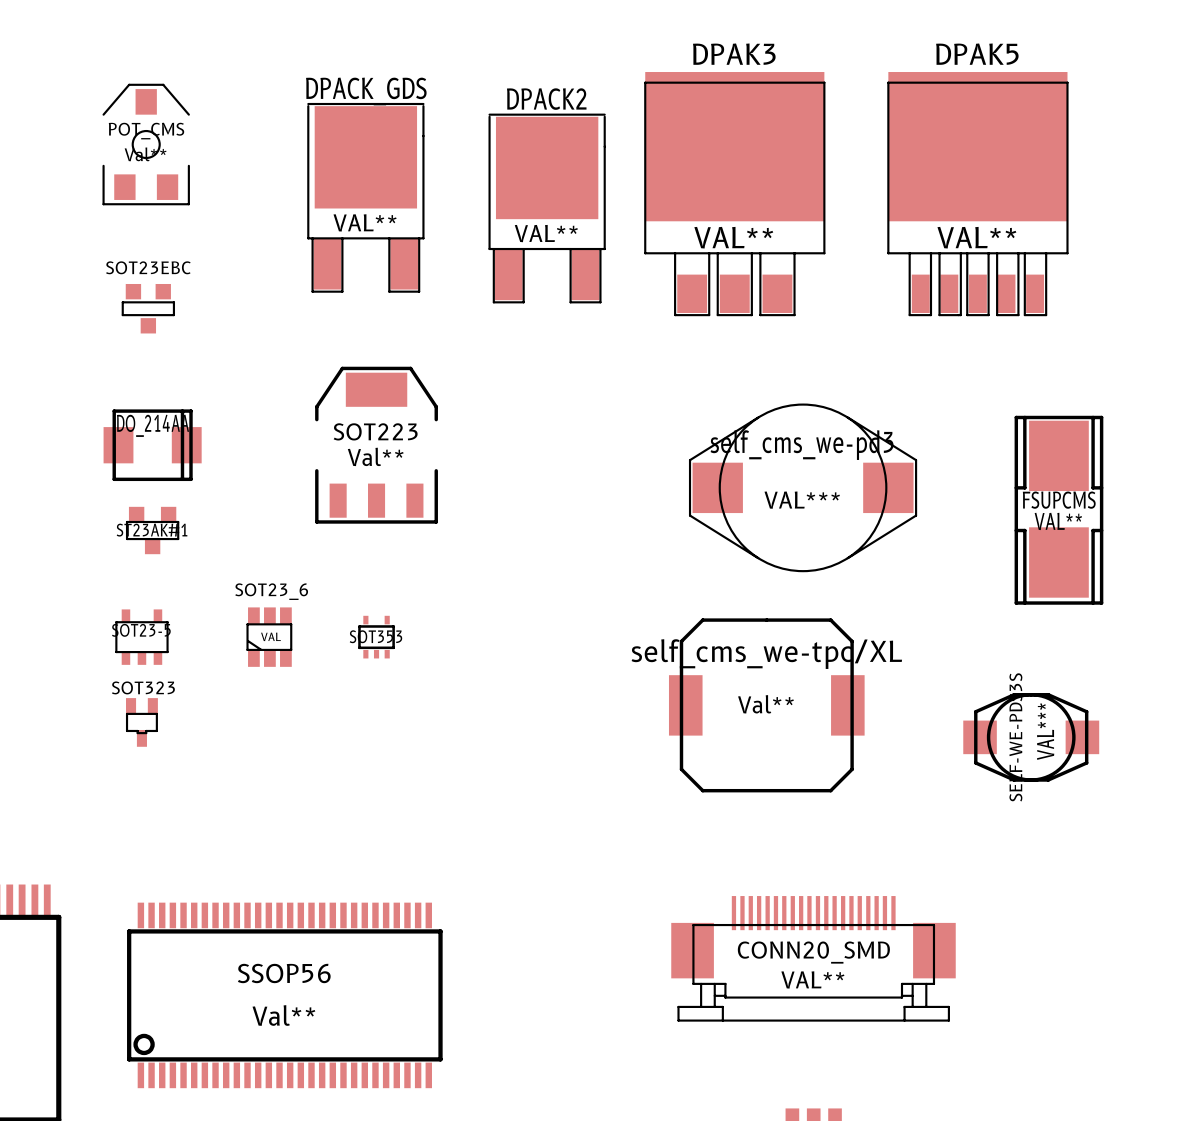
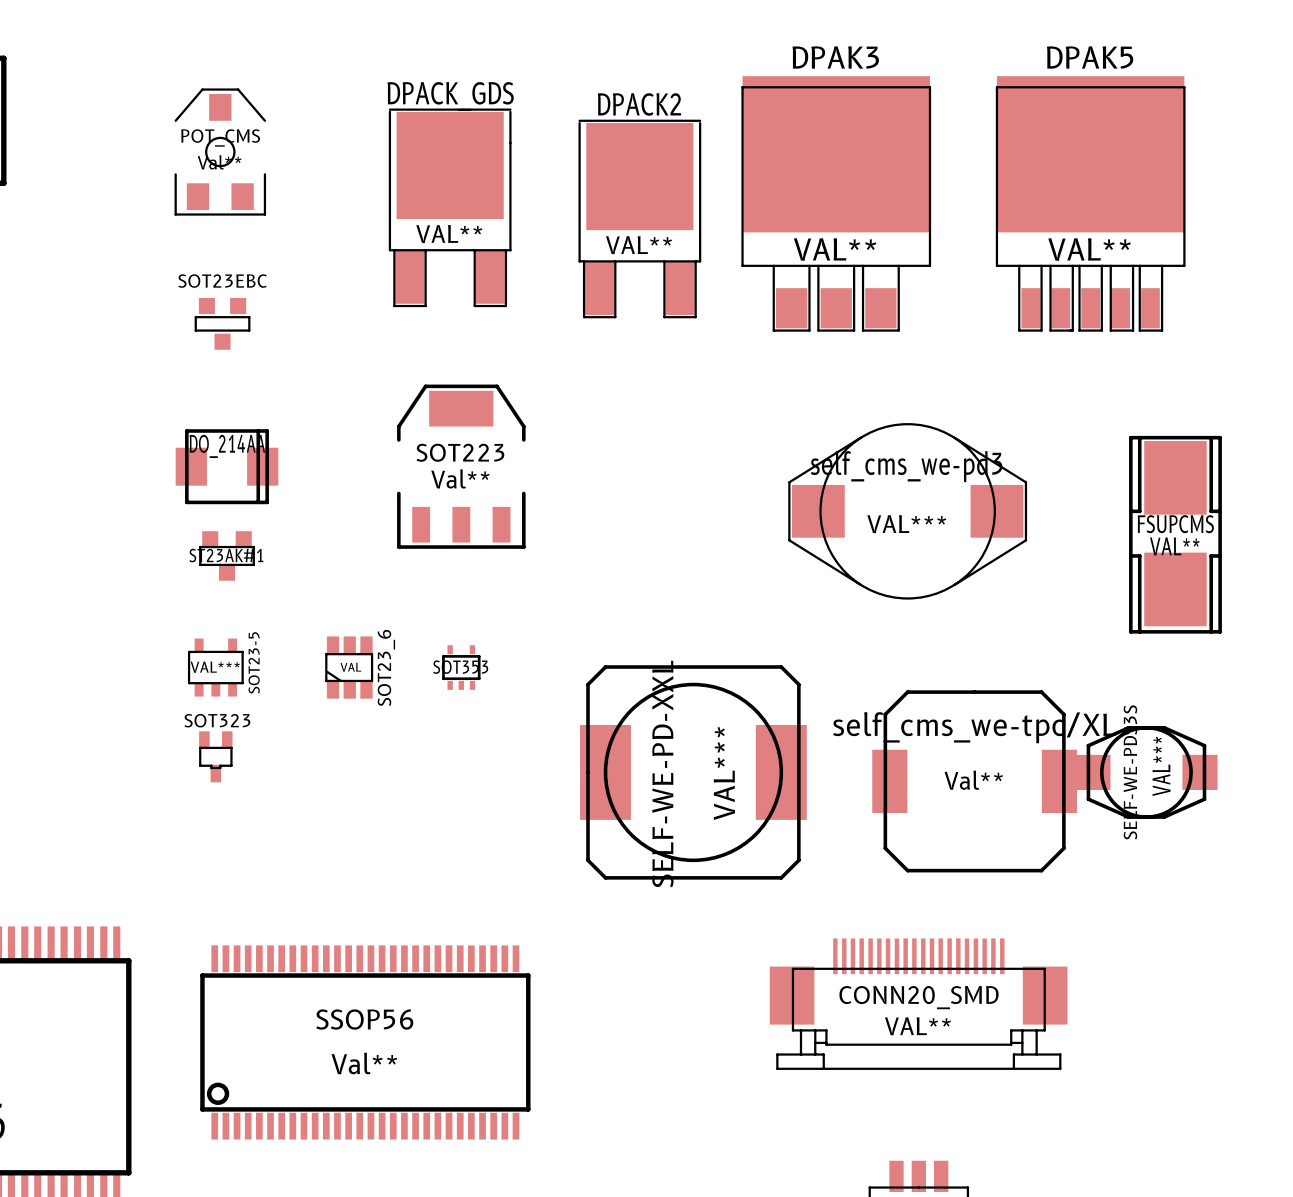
SOT23_6 name rotation: 0° (271, 591) -> 90° counterclockwise (386, 667)
SOT23-5 name rotation: 0° (141, 630) -> 90° counterclockwise (254, 662)
SOT23-5 value: none -> VAL*** (215, 667)
self_cms_we-tpc/XL position: (766, 705) -> (974, 781)
SELF-WE-PD-XXL: none -> VAL*** (693, 772)

